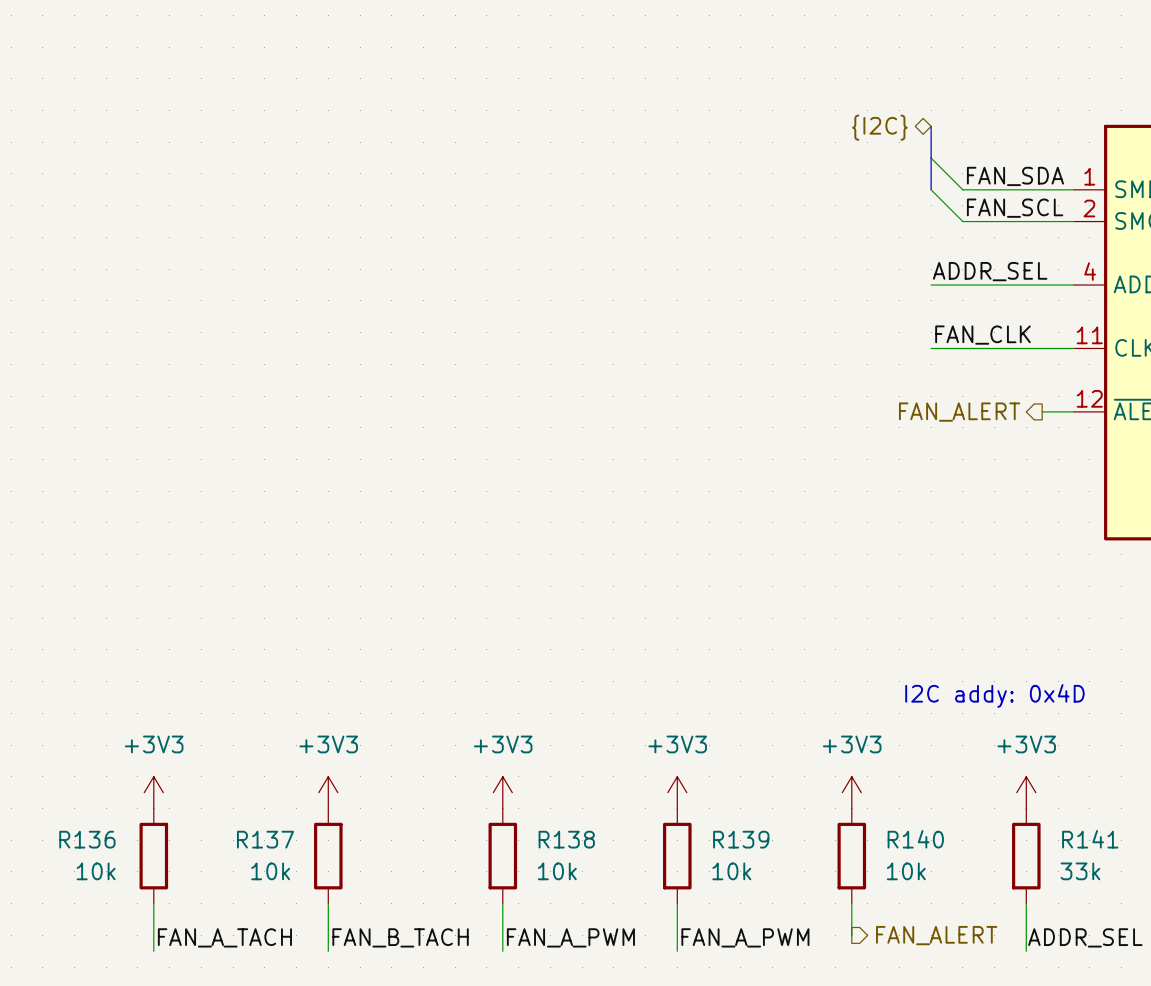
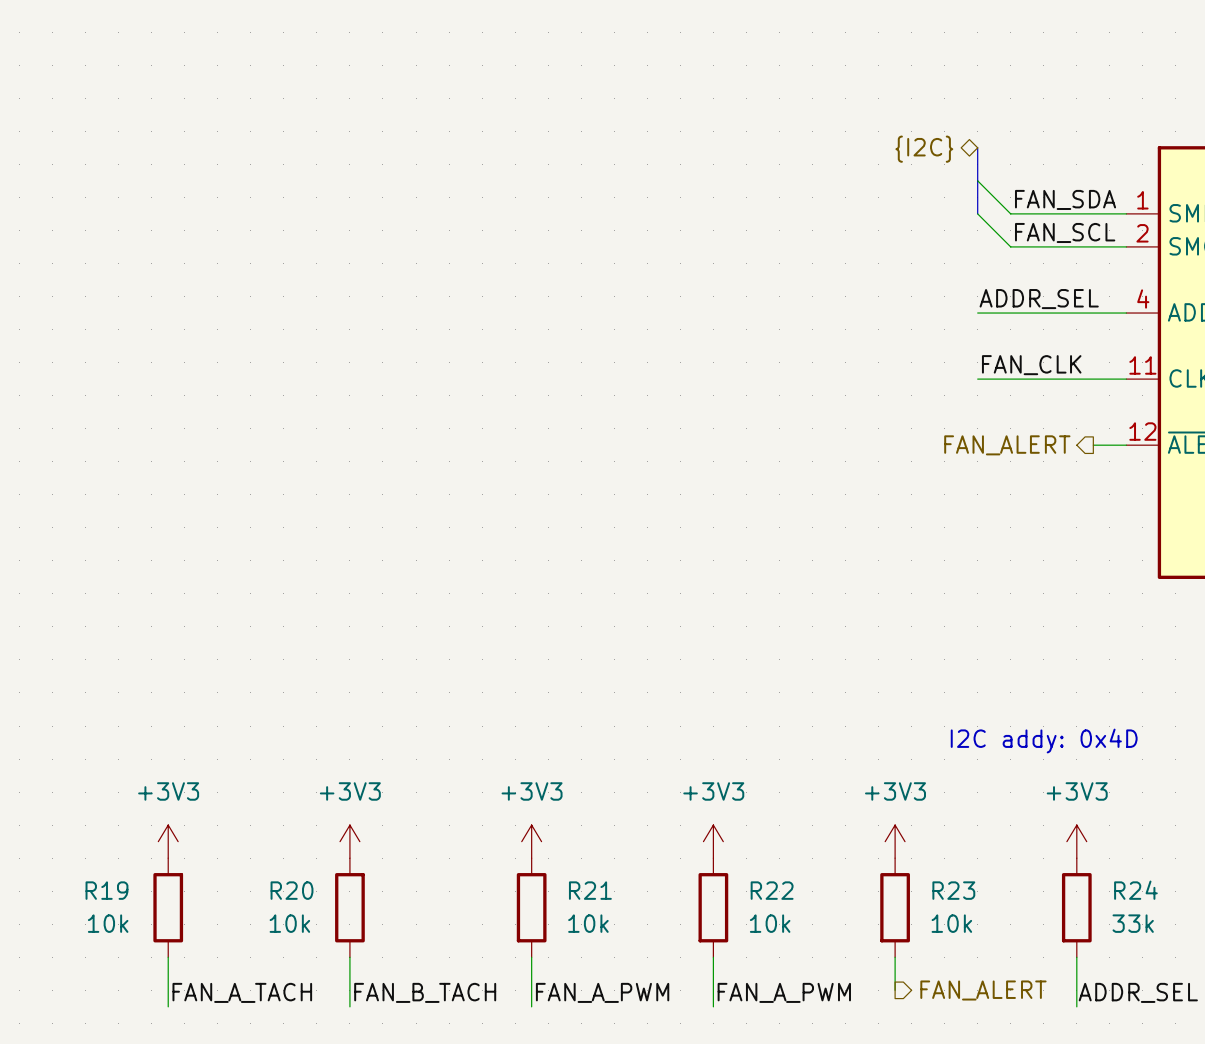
R136 name: R136 (87, 839) -> R19 (106, 890)
R137 name: R137 (265, 839) -> R20 (292, 890)
R138 name: R138 (566, 839) -> R21 (590, 890)
R139 name: R139 (741, 839) -> R22 (772, 890)
R140 name: R140 (915, 839) -> R23 (953, 890)
R141 name: R141 (1090, 839) -> R24 (1135, 890)

